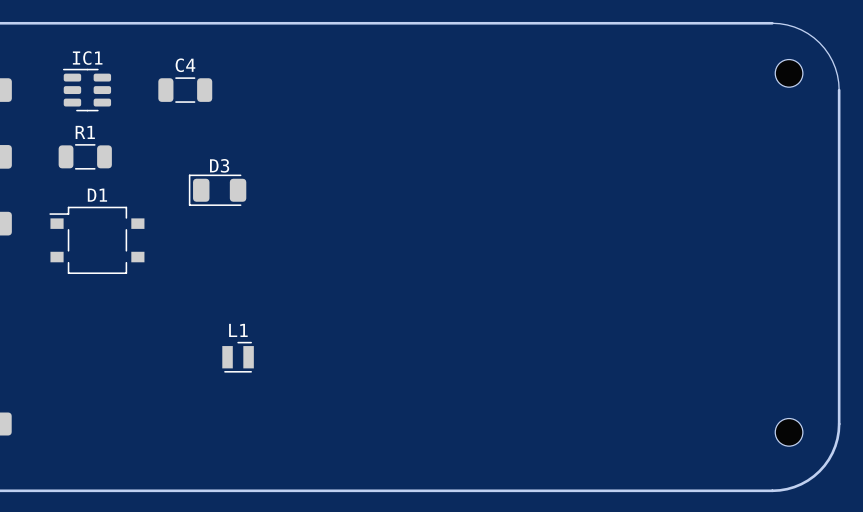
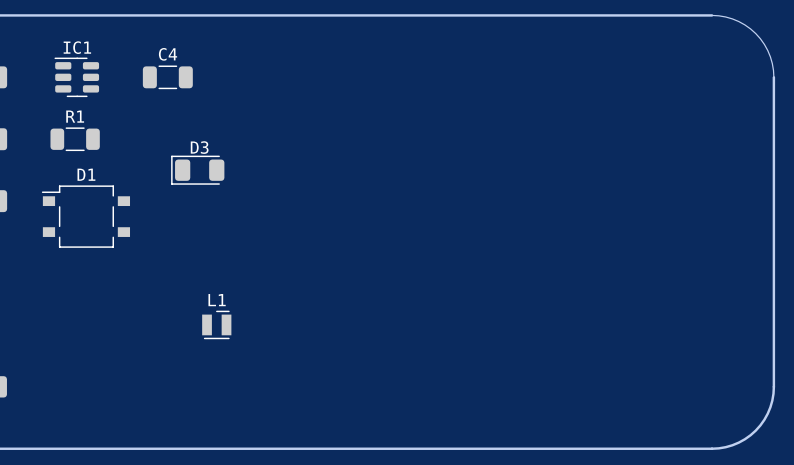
part: (789, 73) -> none
part: (789, 432) -> none

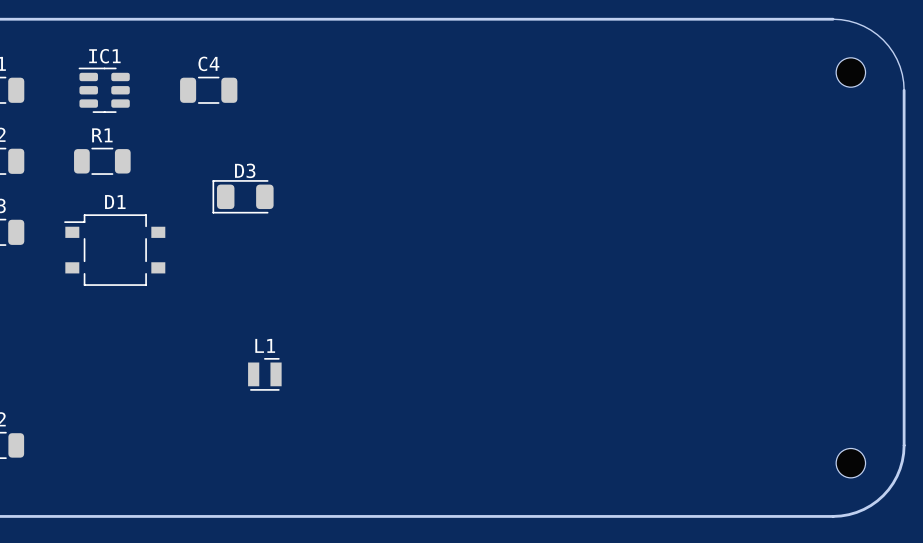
part: none -> (850, 72)
part: none -> (850, 463)

